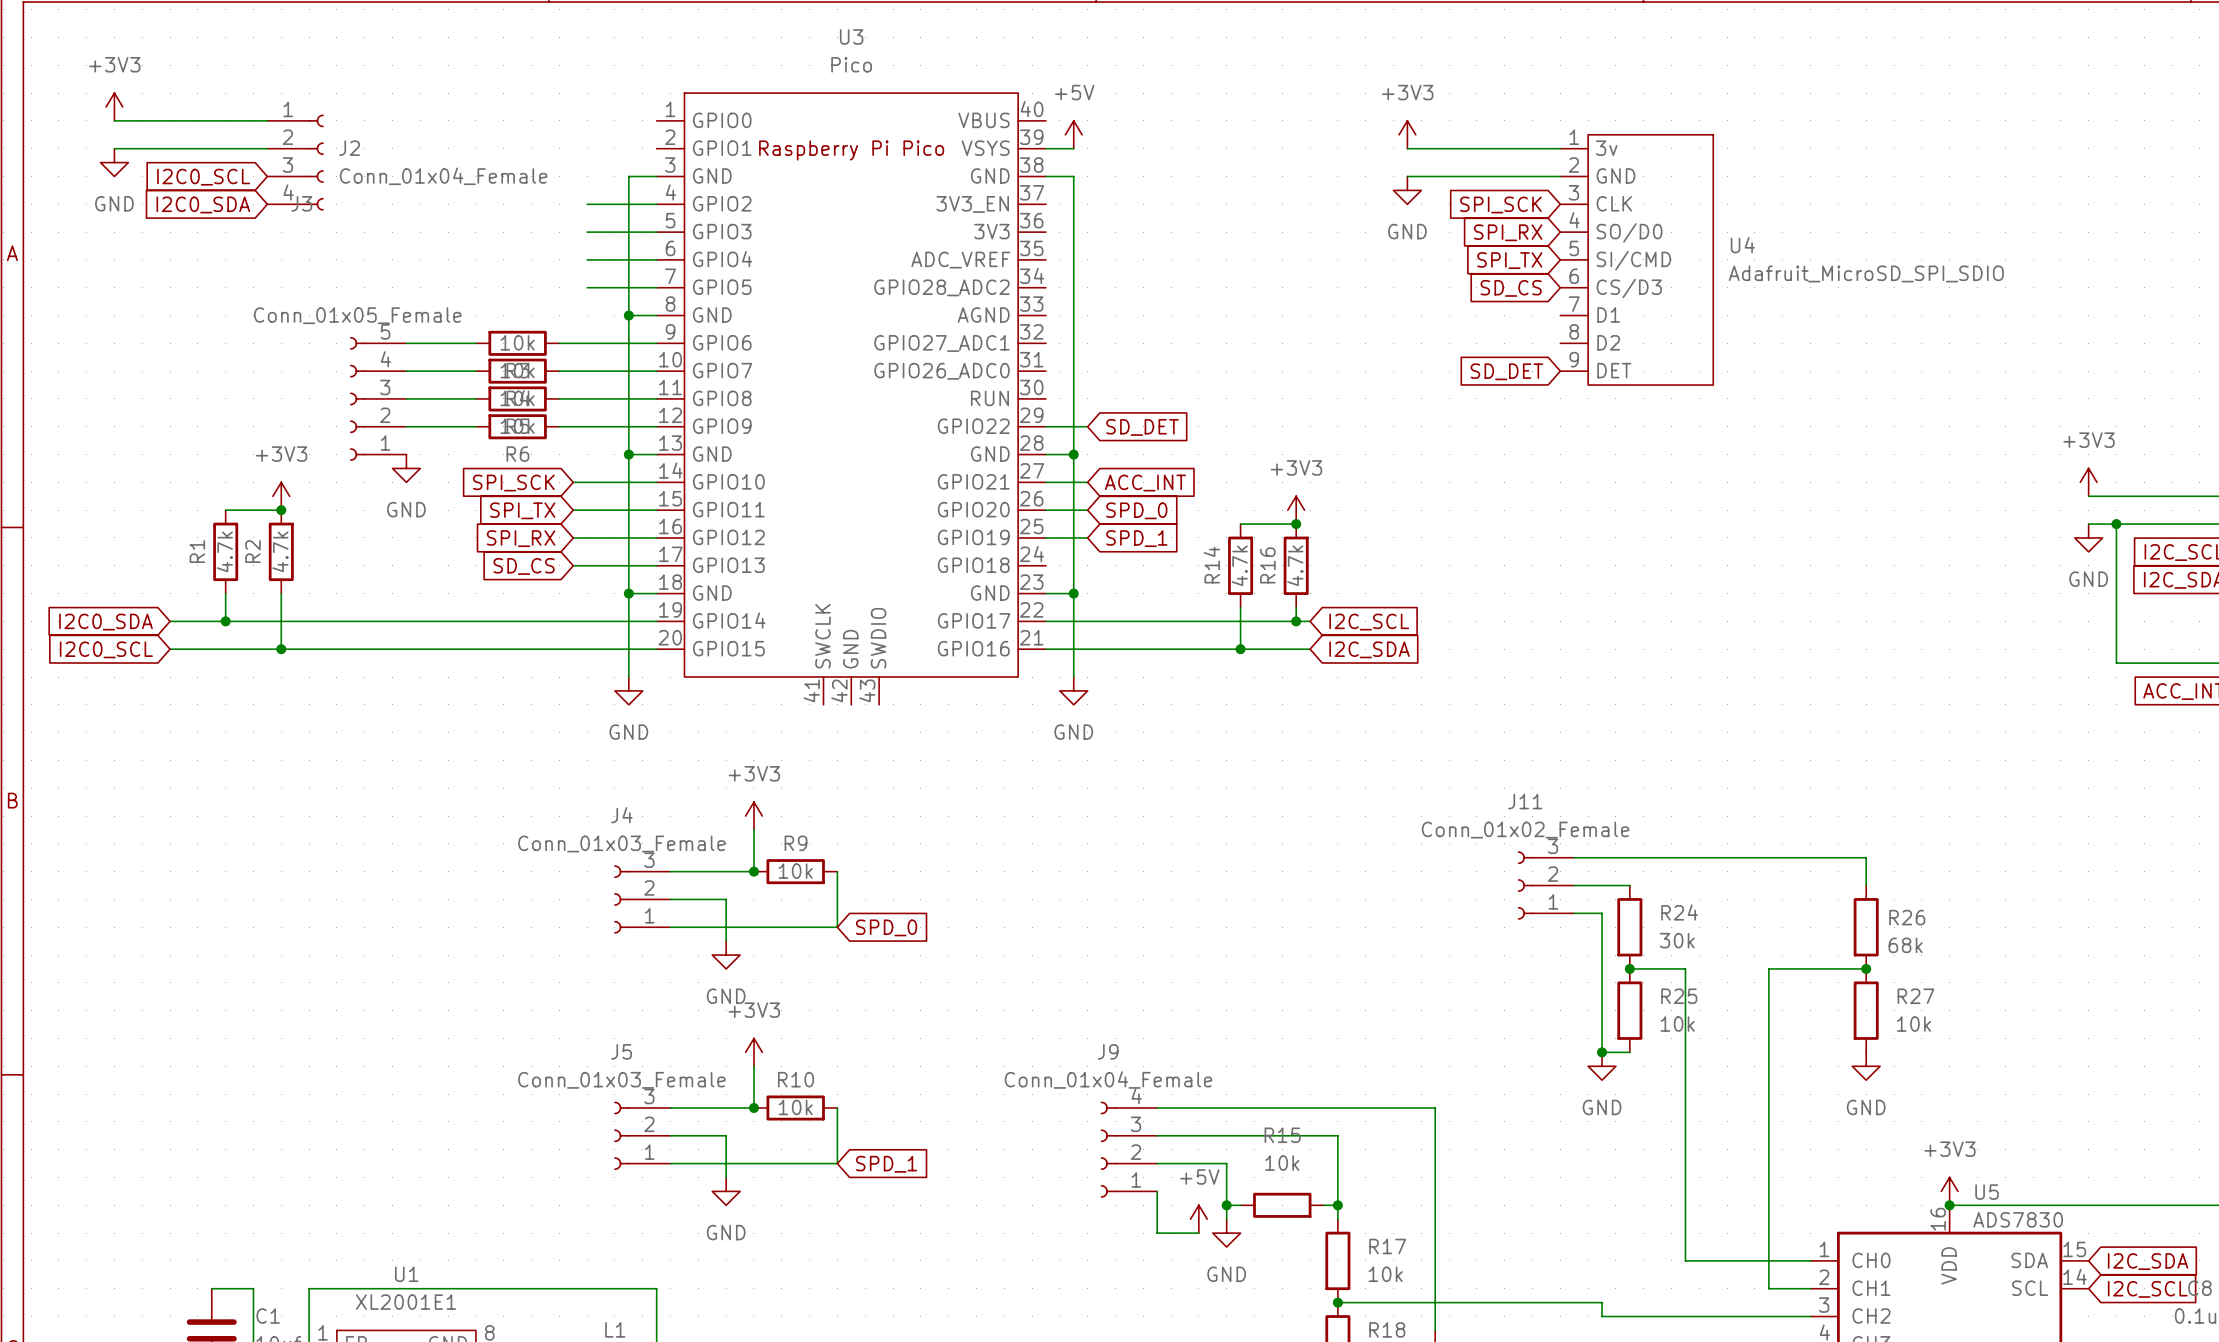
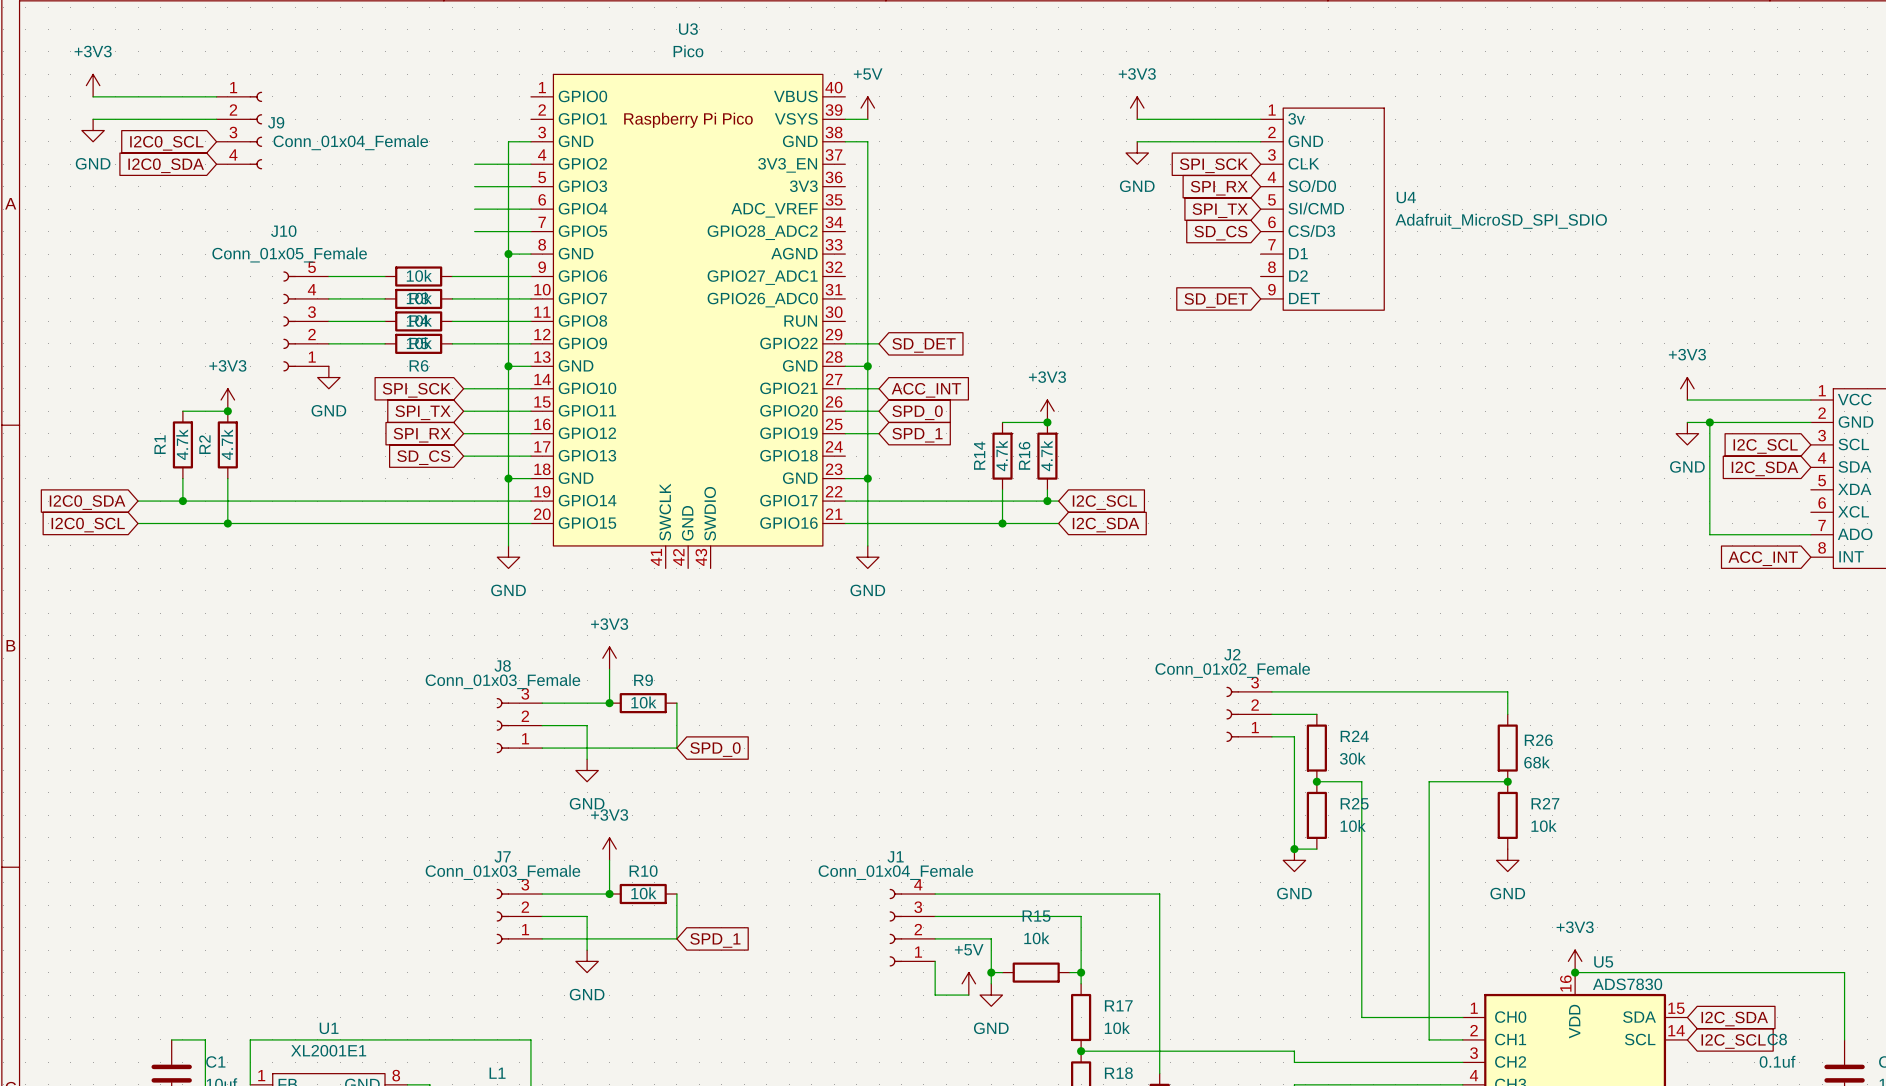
J2 name: J2 (349, 148) -> J9 (276, 122)
J3 name: J3 (301, 203) -> J10 (283, 231)
J11 name: J11 (1525, 801) -> J2 (1232, 654)
J4 name: J4 (621, 815) -> J8 (502, 665)
J5 name: J5 (621, 1051) -> J7 (502, 856)
J9 name: J9 (1108, 1051) -> J1 (895, 856)

